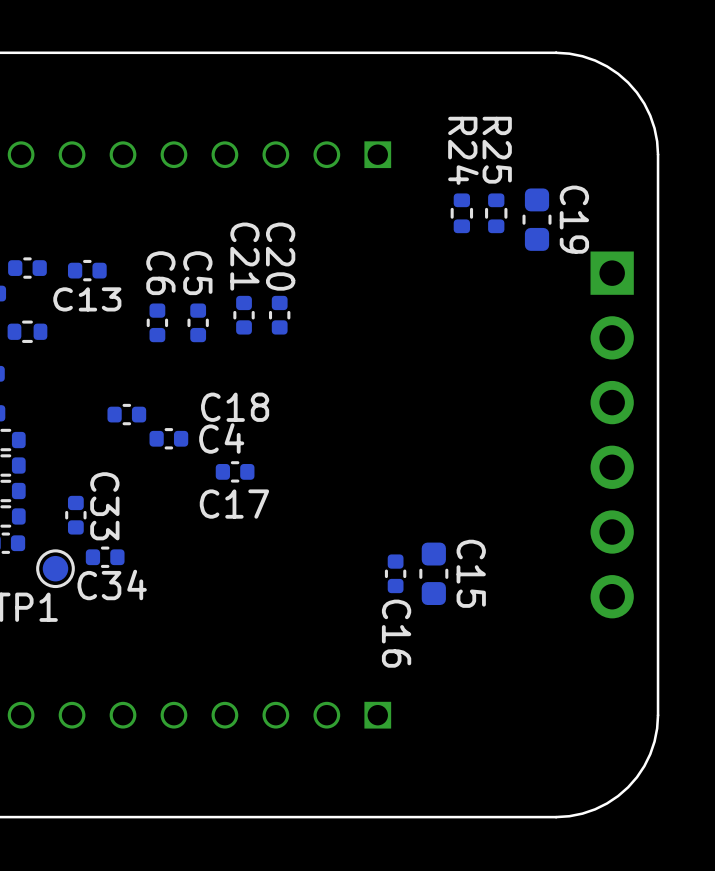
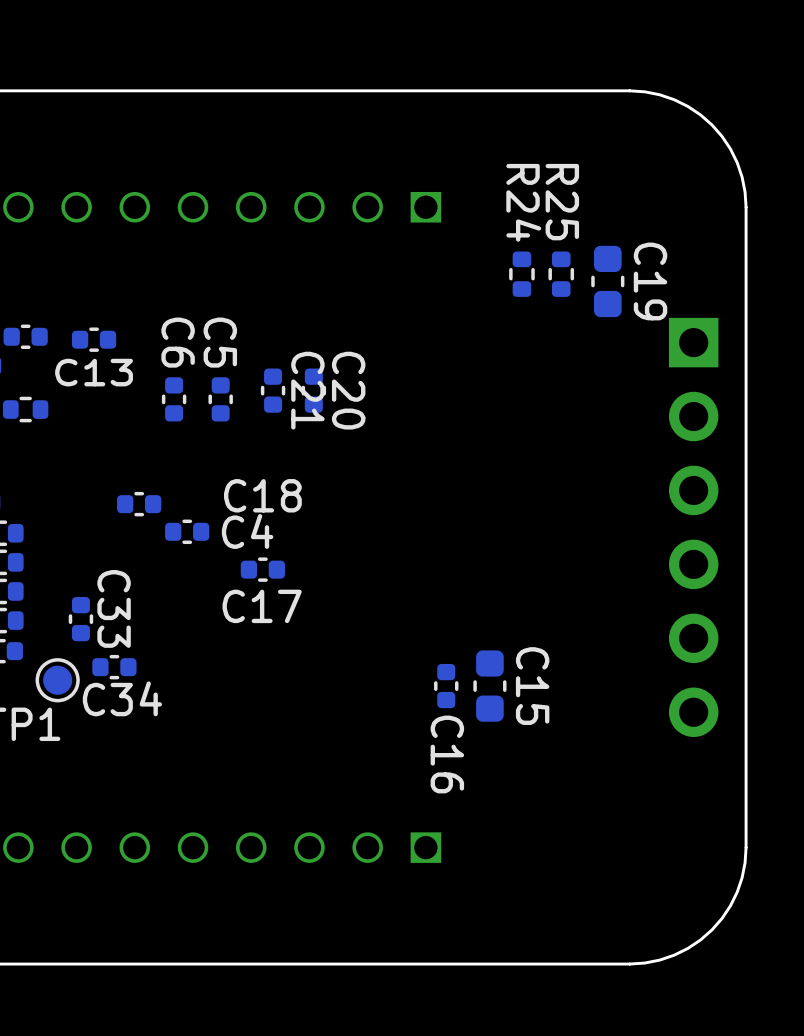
C21 name position: C21 (244, 256) -> C21 (307, 390)
C20 name position: C20 (280, 256) -> C20 (348, 390)

